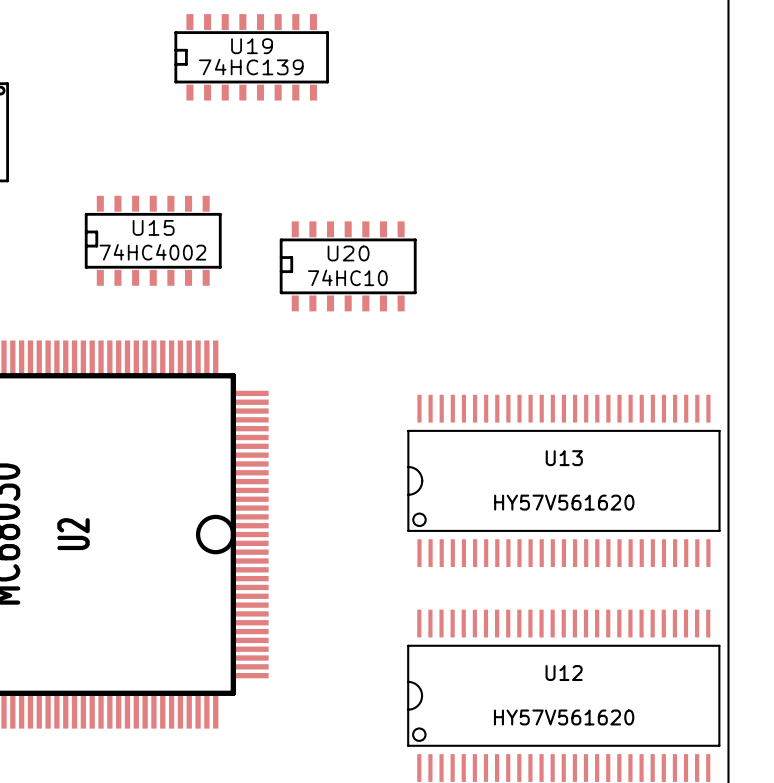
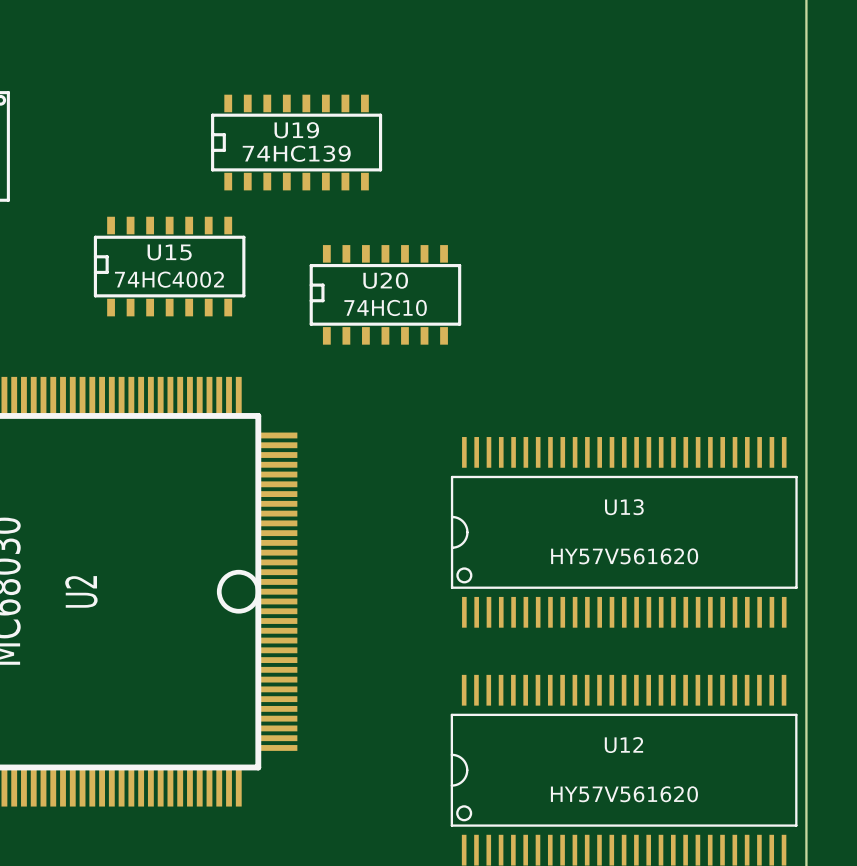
U19 position: (251, 57) -> (296, 142)

